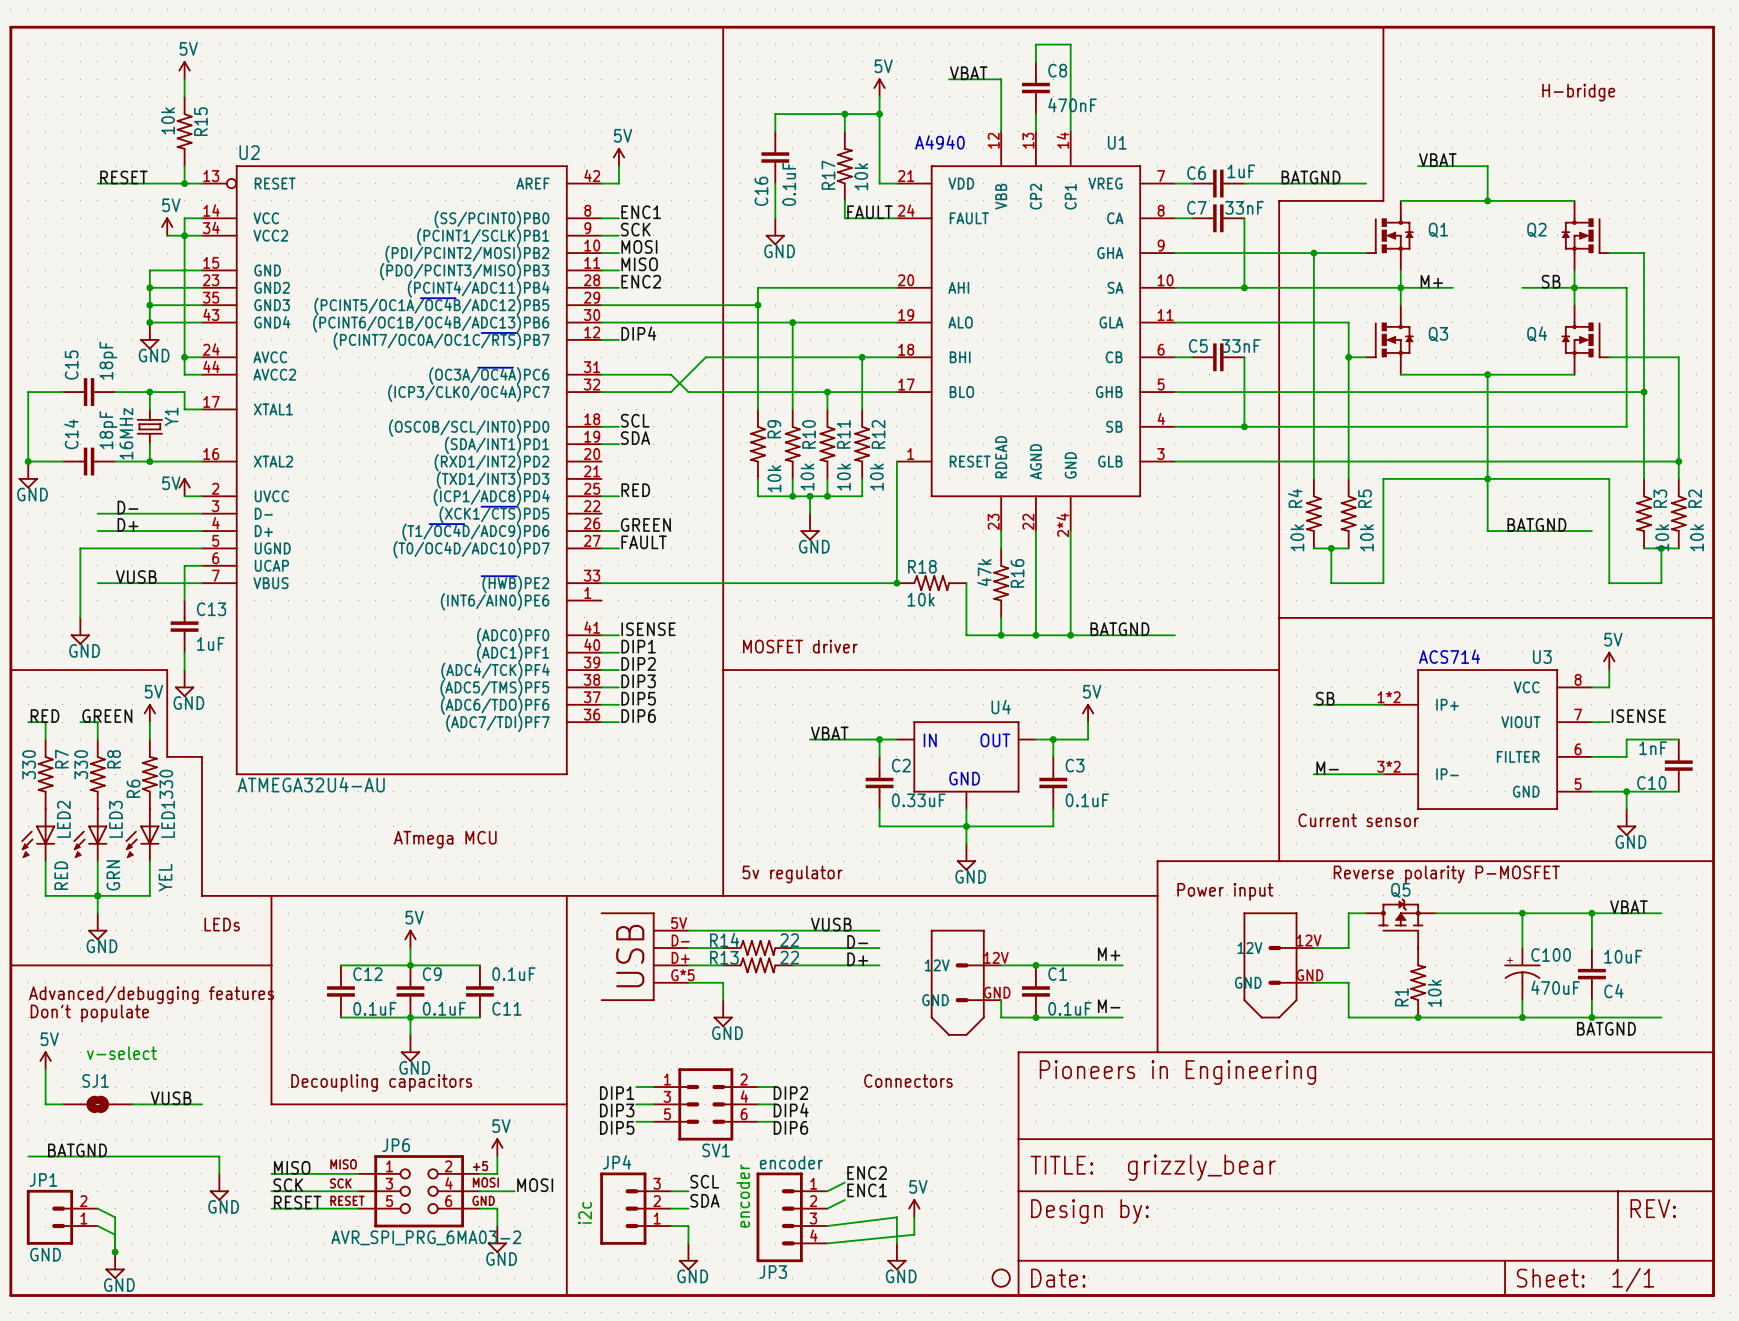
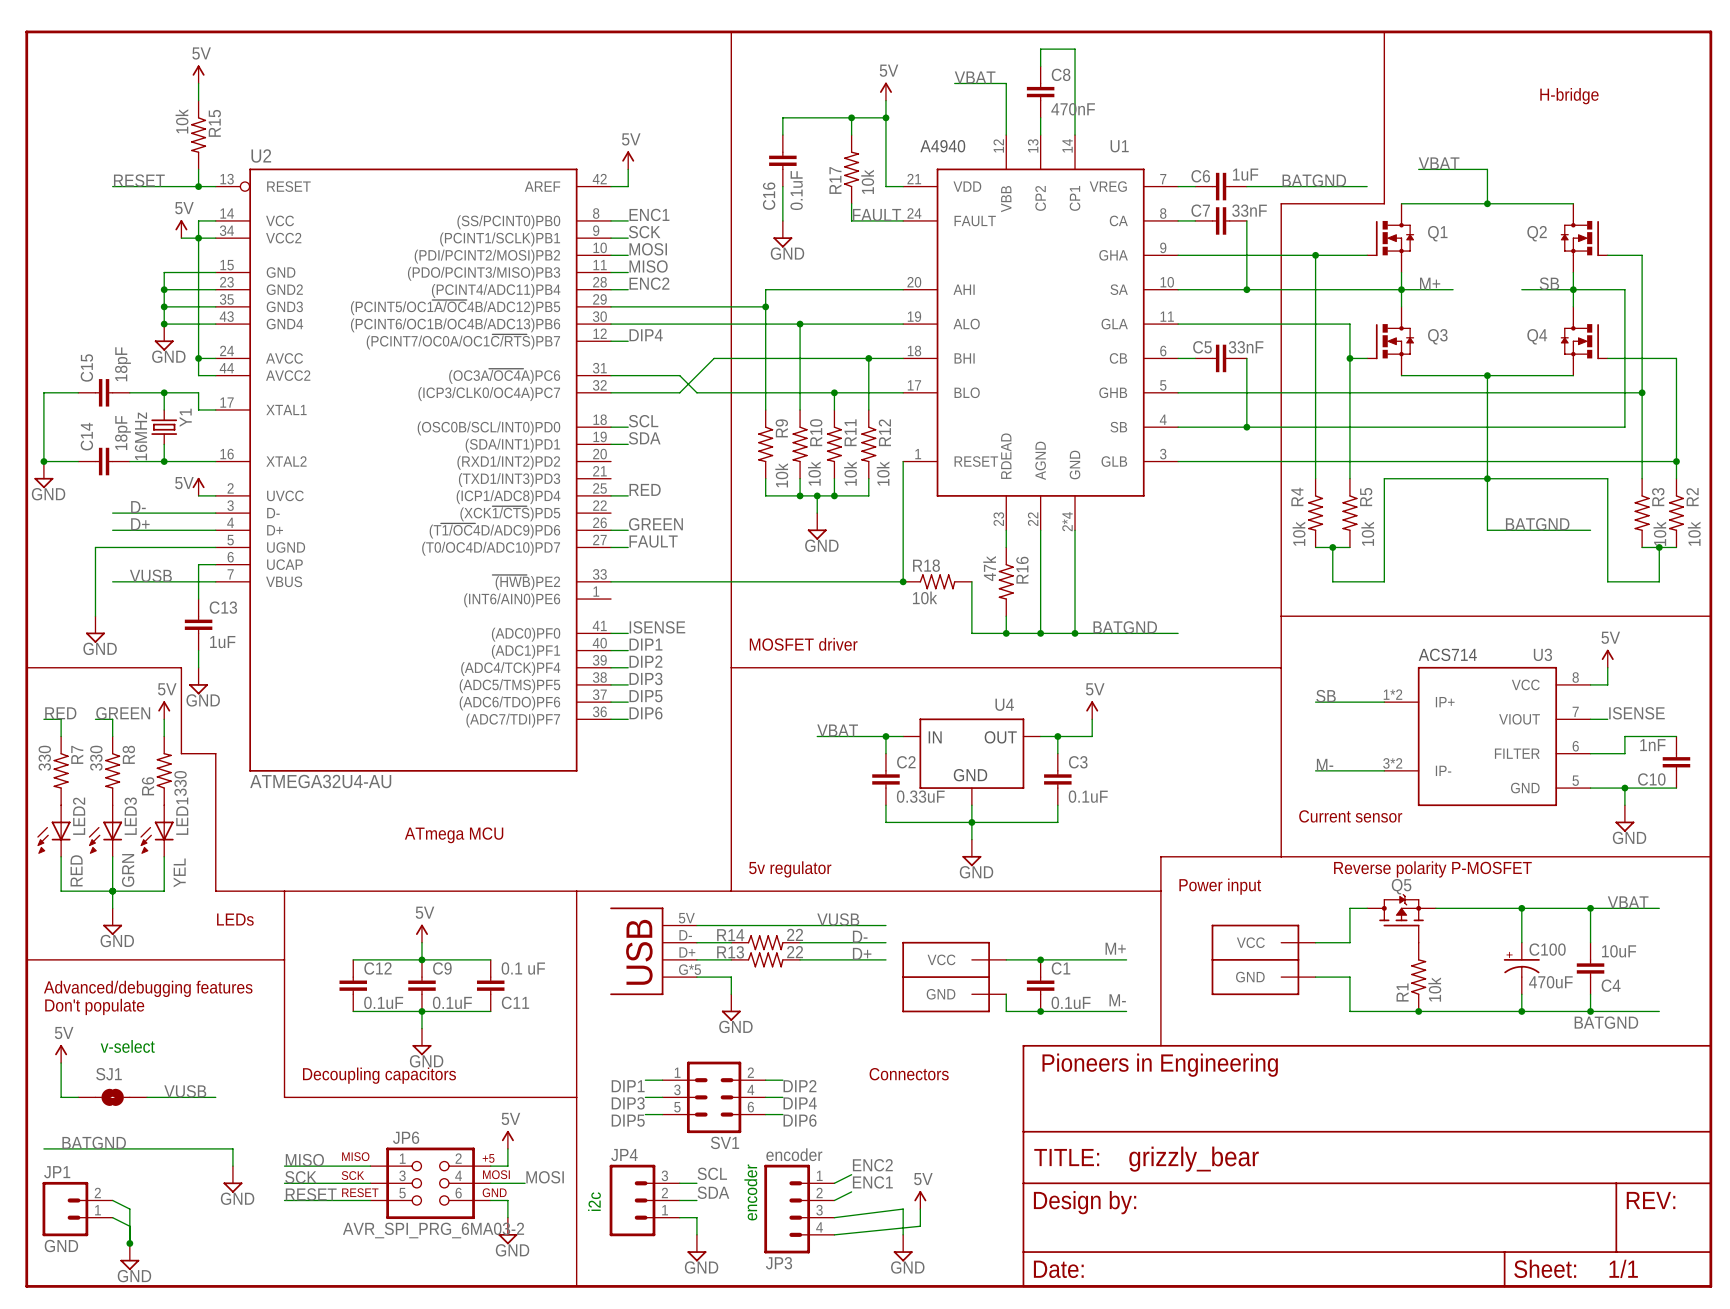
part: none -> (1263, 959)
part: (1278, 965) -> none
C11 value: 0.1uF (513, 974) -> 0.1 uF (523, 968)
part: none -> (954, 977)
part: (966, 982) -> none
part: (1001, 1278) -> none

